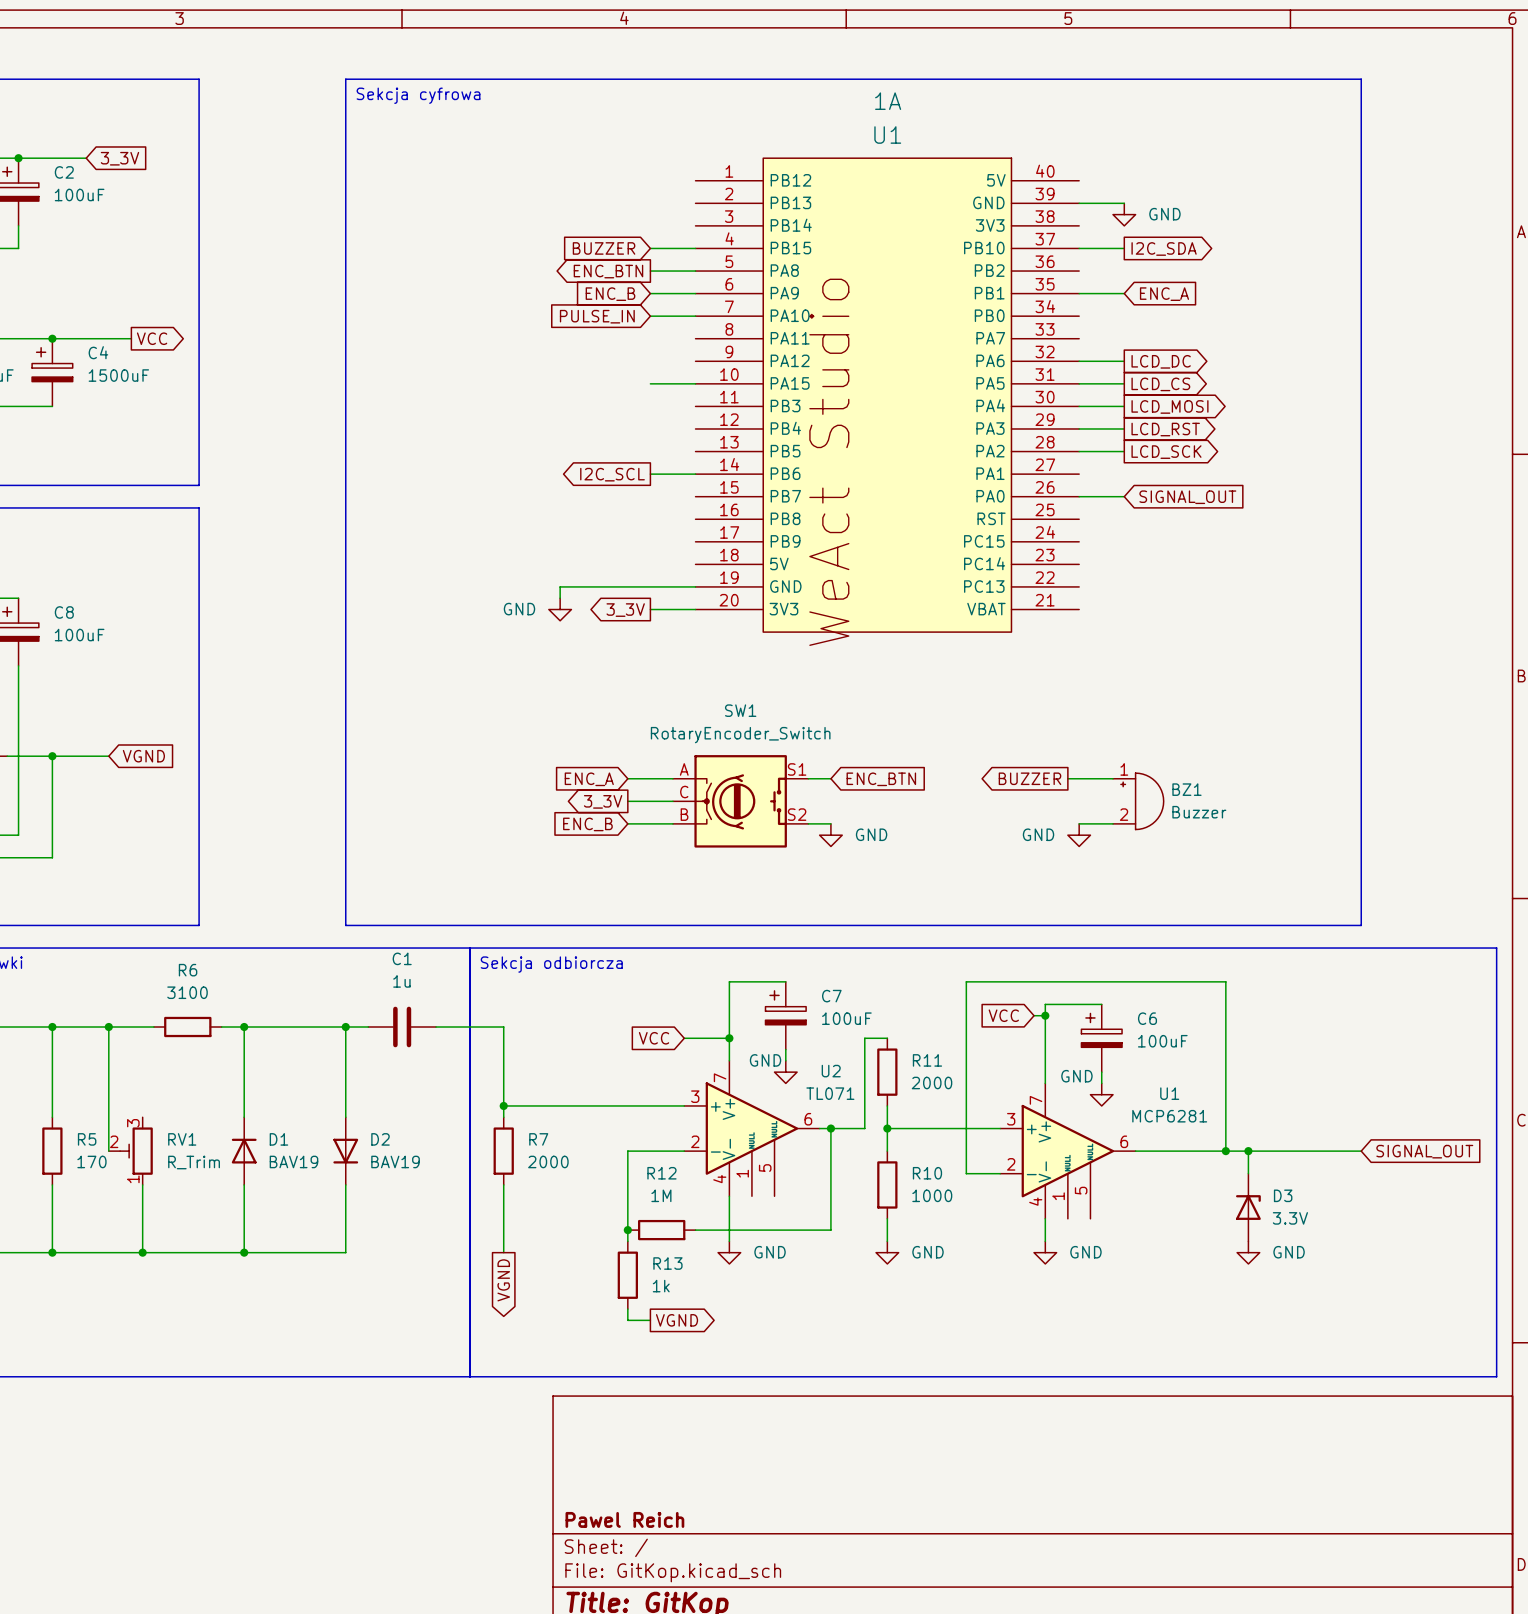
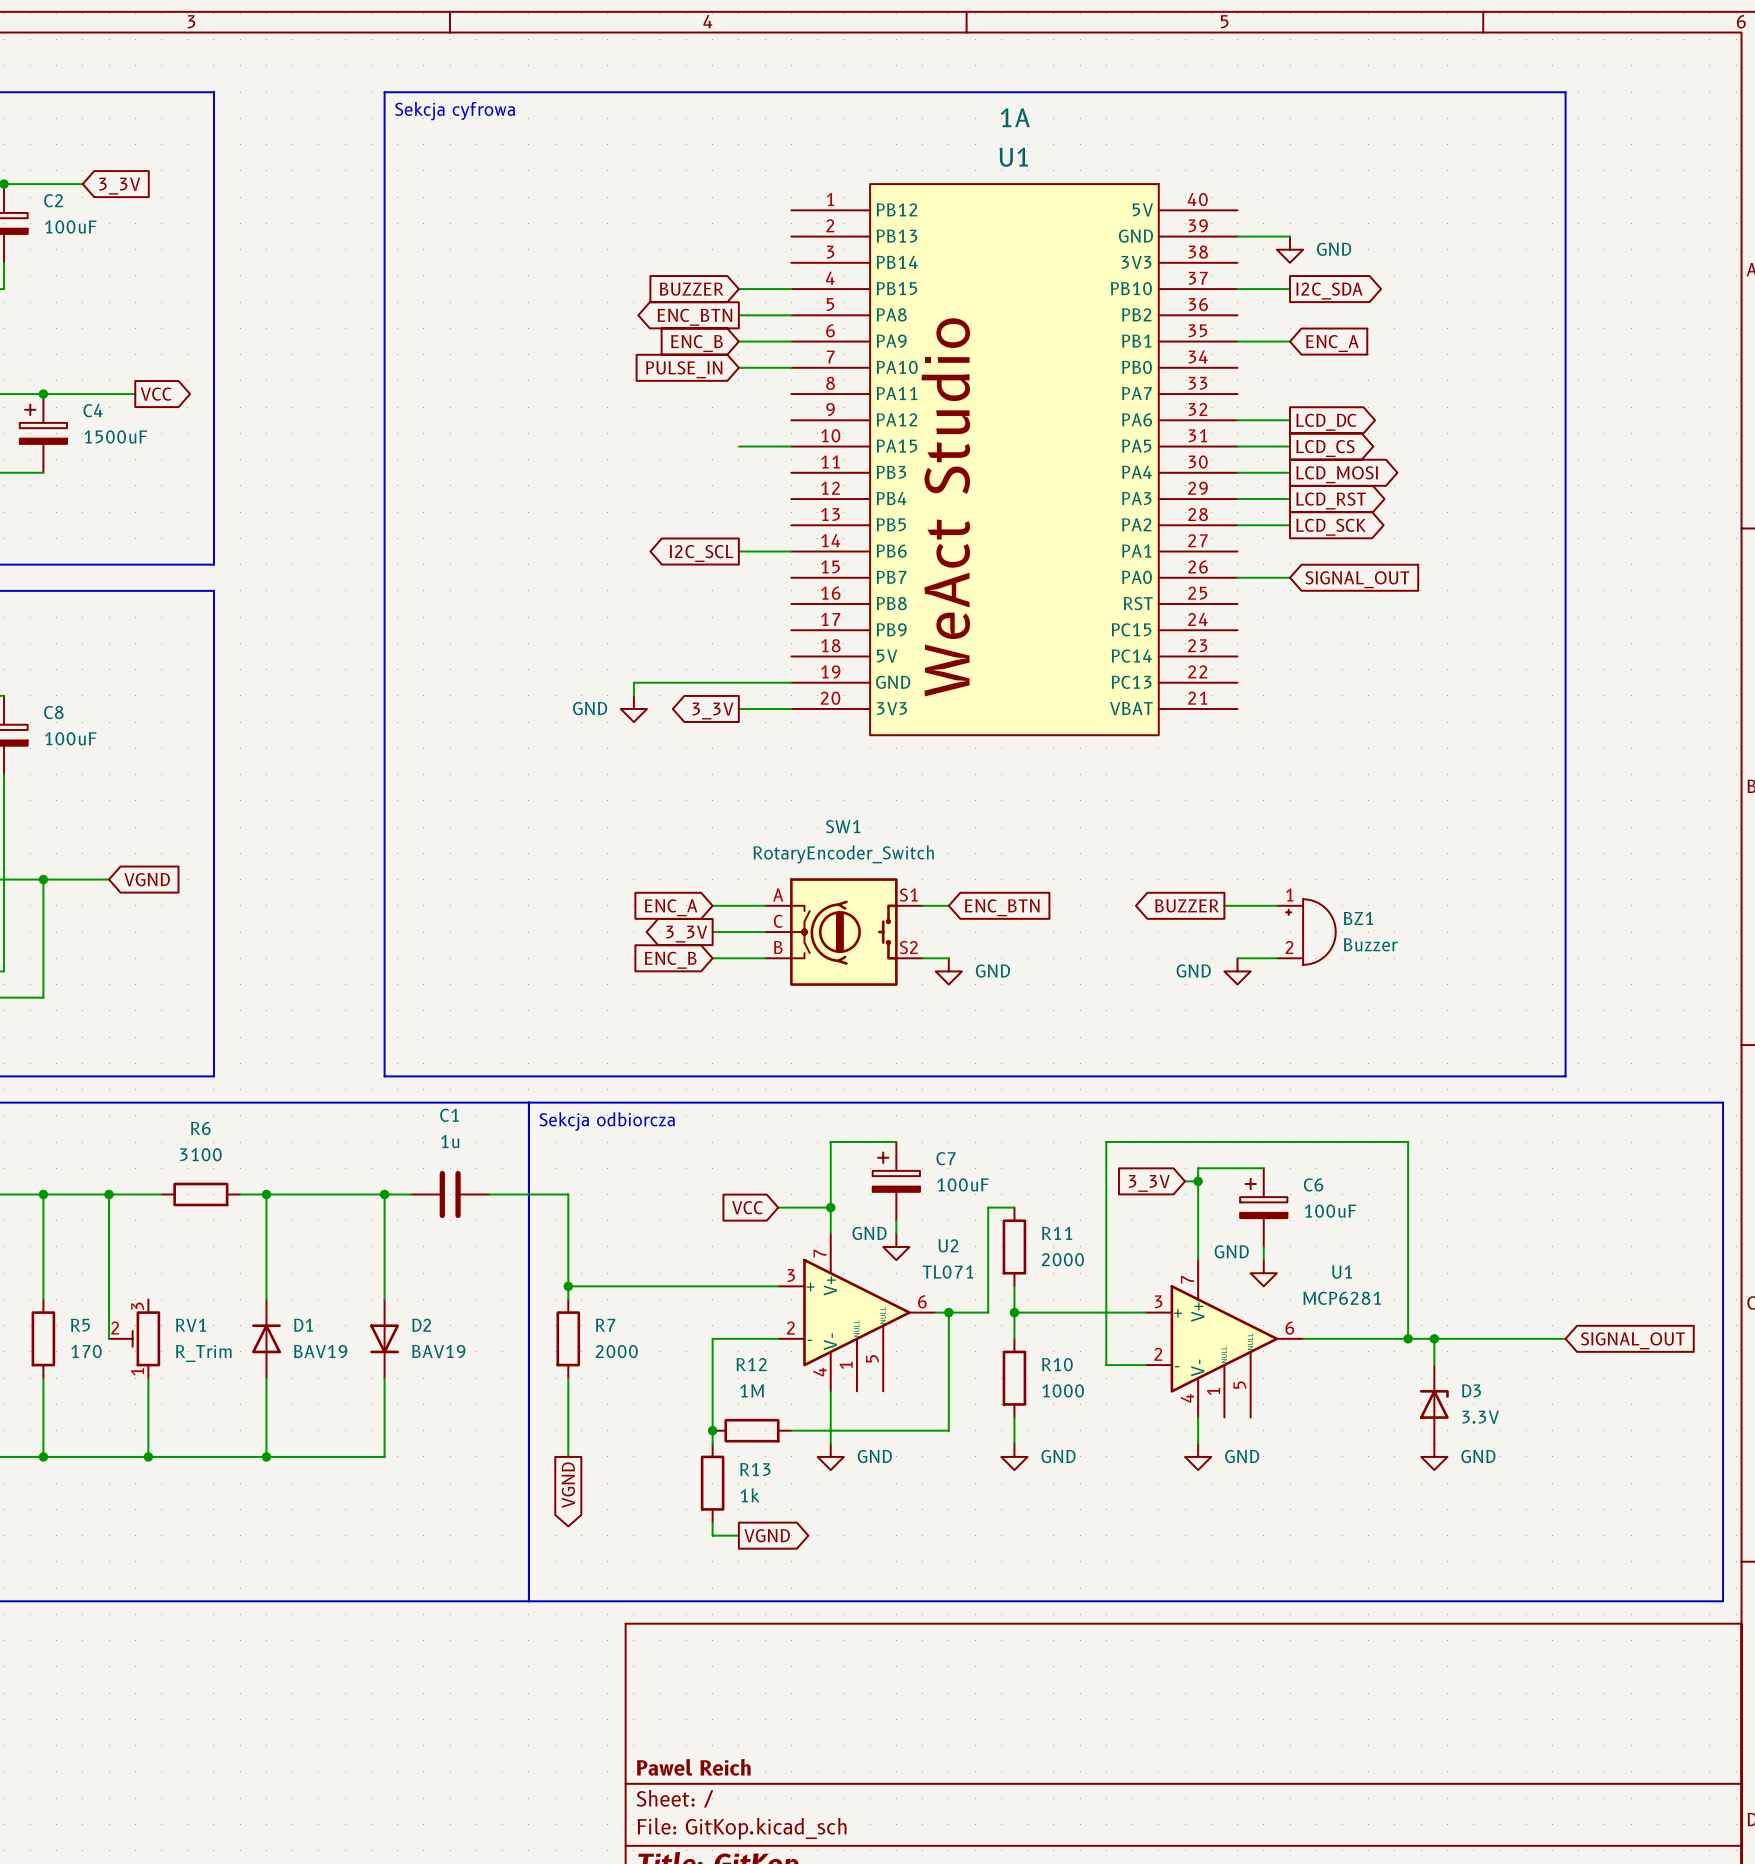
global label: VCC (1003, 1015) -> 3_3V (1149, 1183)

